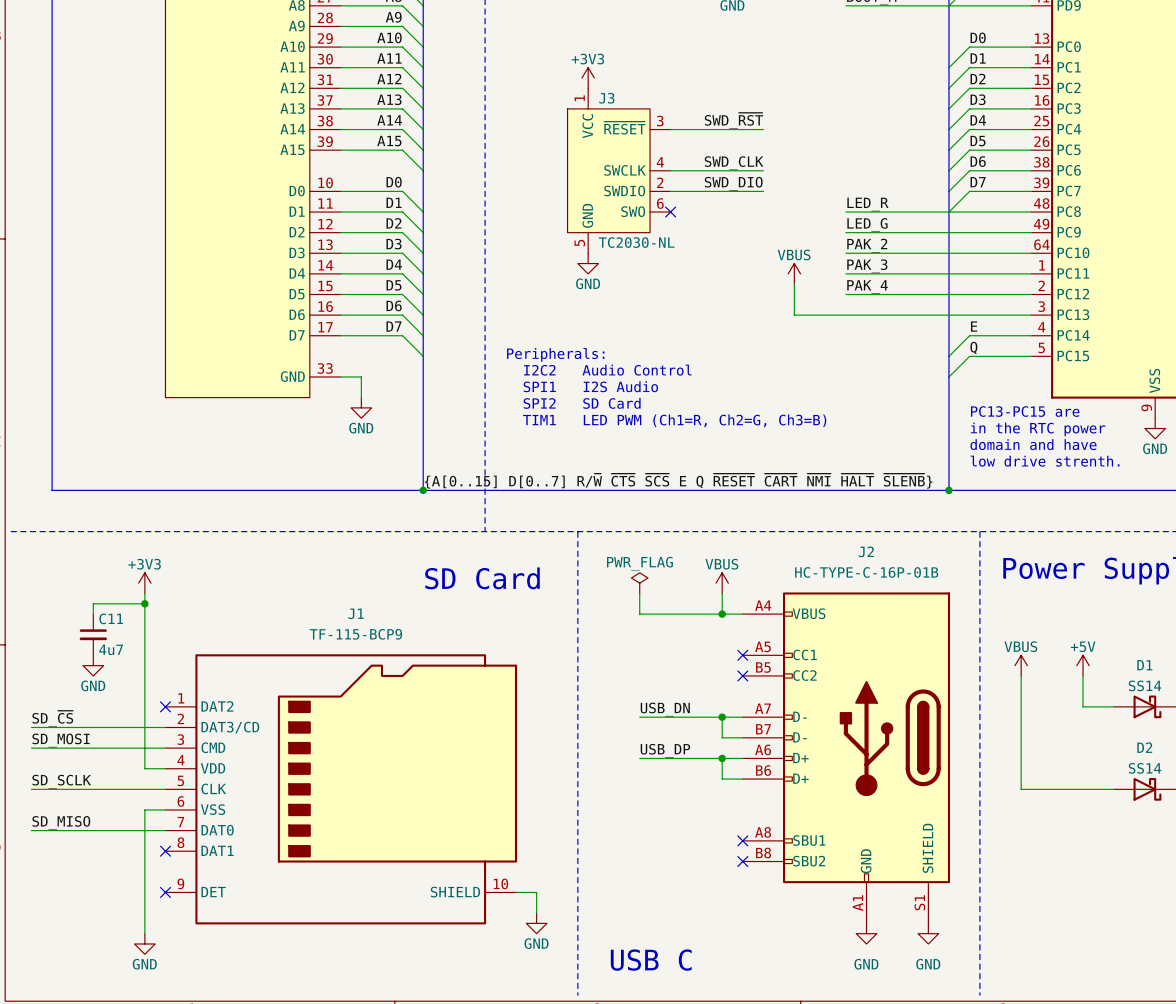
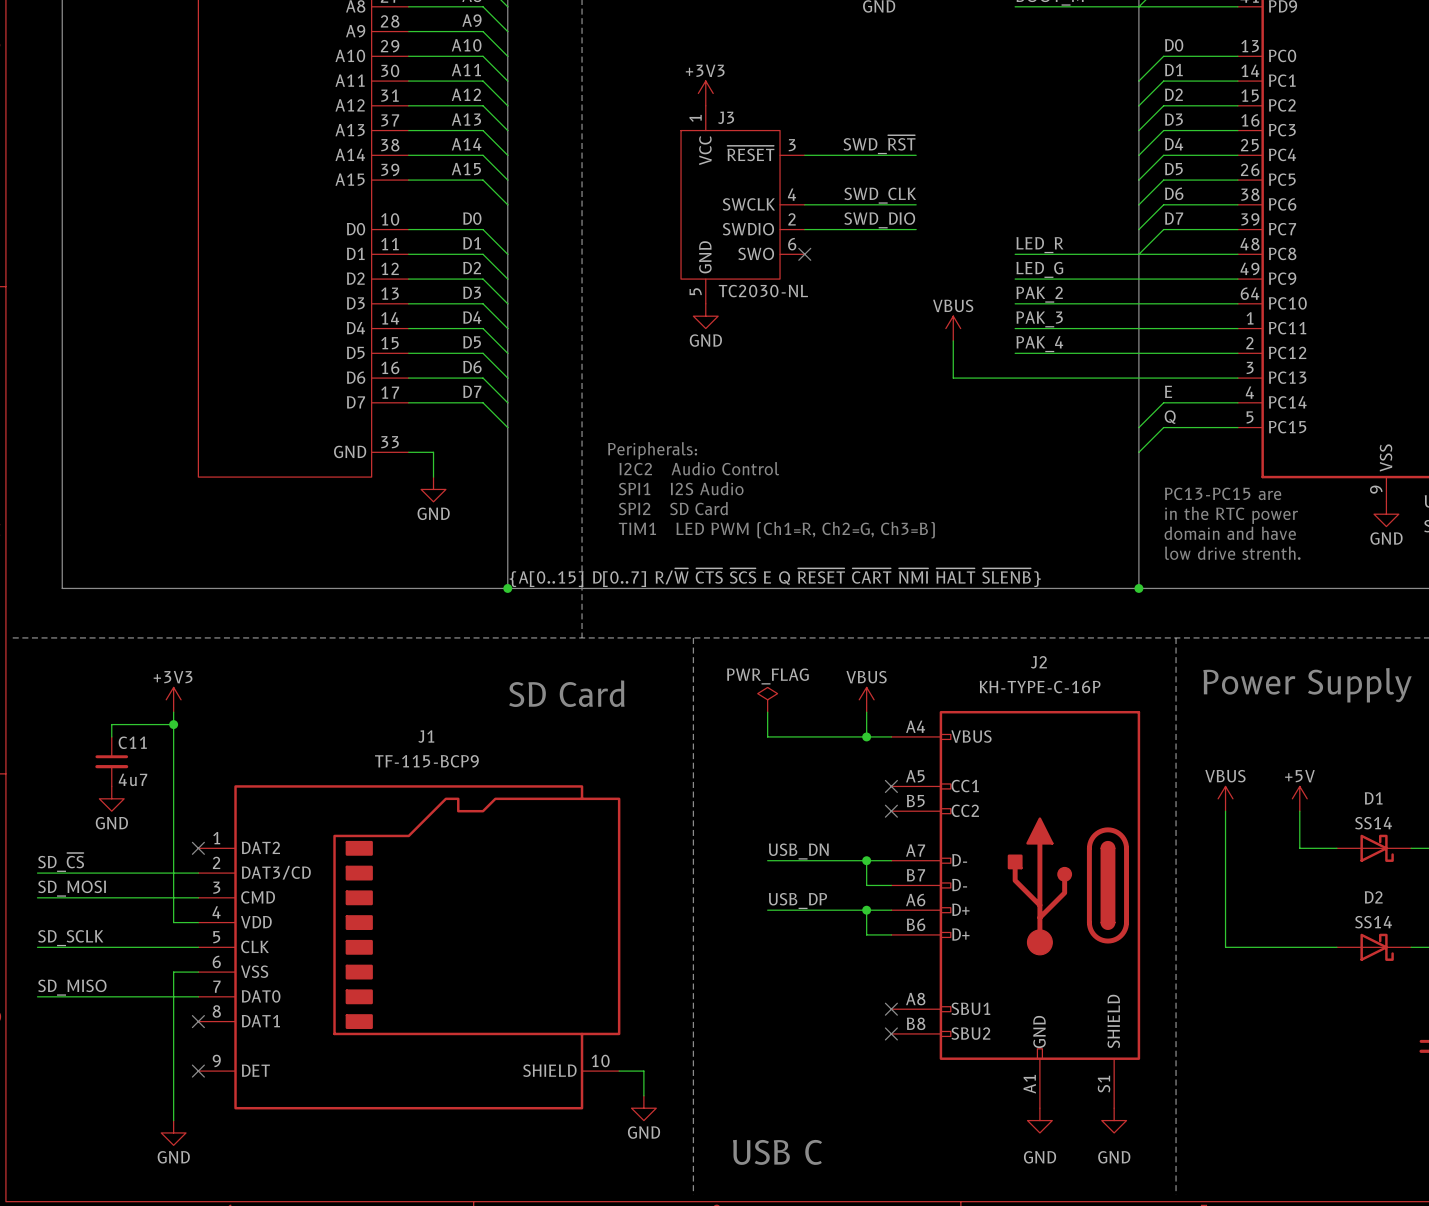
text: Peripherals: (555, 354) -> none
text: I2C2 Audio Control (607, 370) -> Peripherals: (652, 450)
text: SPI1 I2S Audio (590, 386) -> I2C2 Audio Control (699, 468)
text: SPI2 SD Card (582, 403) -> SPI1 I2S Audio (681, 488)
text: TIM1 LED PWM (Ch1=R, Ch2=G, Ch3=B) (674, 420) -> SPI2 SD Card (673, 508)
text: none -> TIM1 LED PWM (Ch1=R, Ch2=G, Ch3=B) (776, 530)
J2 value: HC-TYPE-C-16P-01B (866, 572) -> KH-TYPE-C-16P (1040, 687)

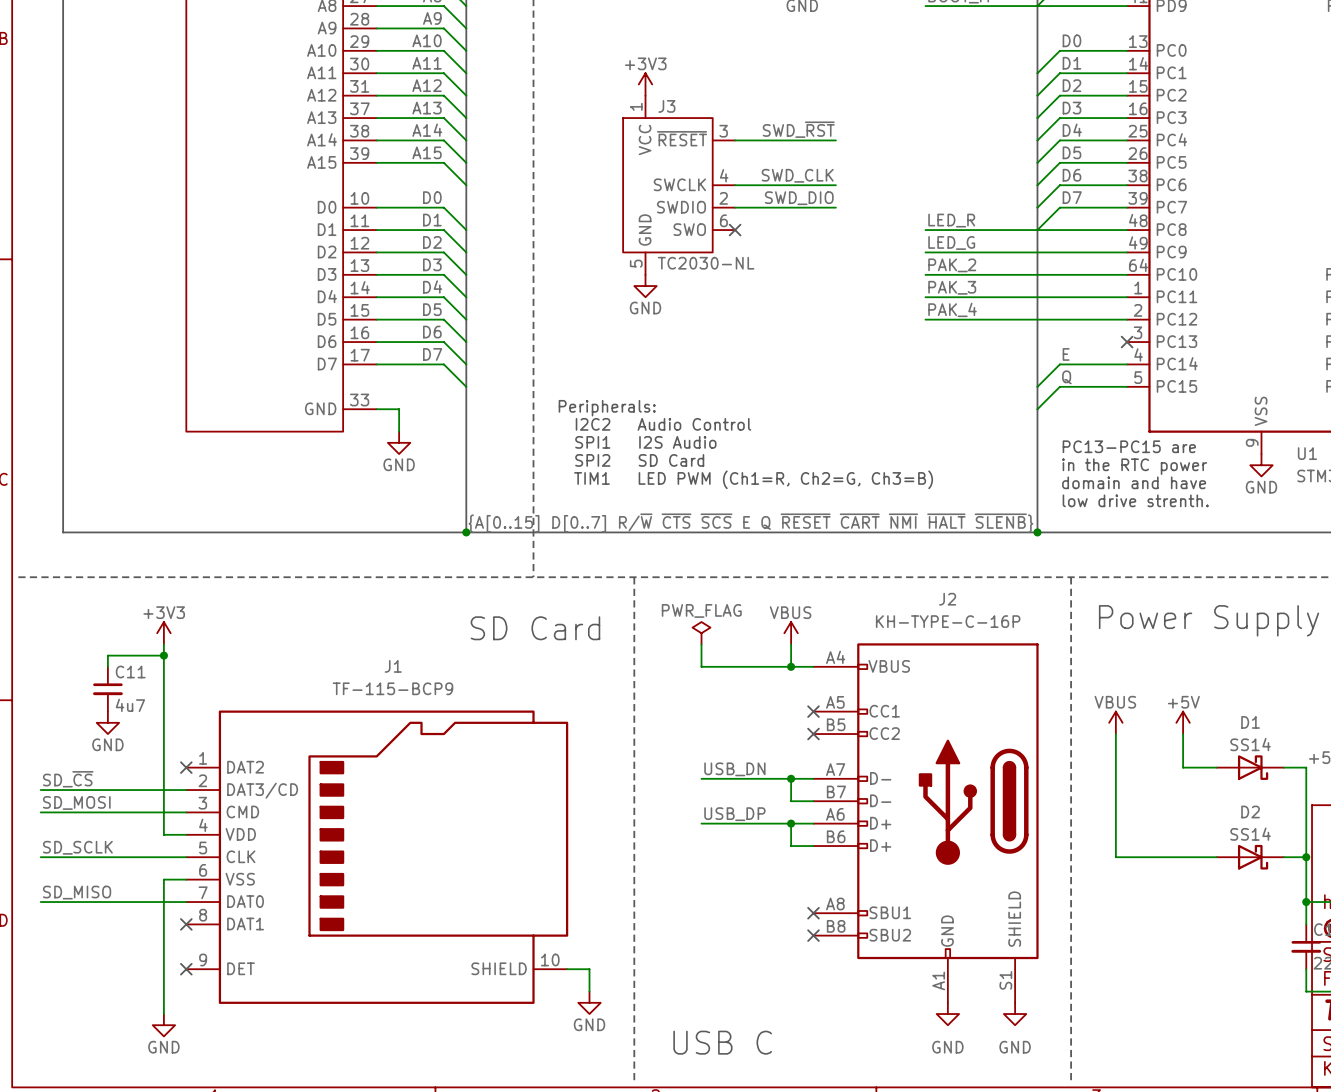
power symbol: VBUS (953, 328) -> none
wire: (953, 340) (953, 378) (1237, 378) -> none
no-connect mark: none -> (1127, 342)

